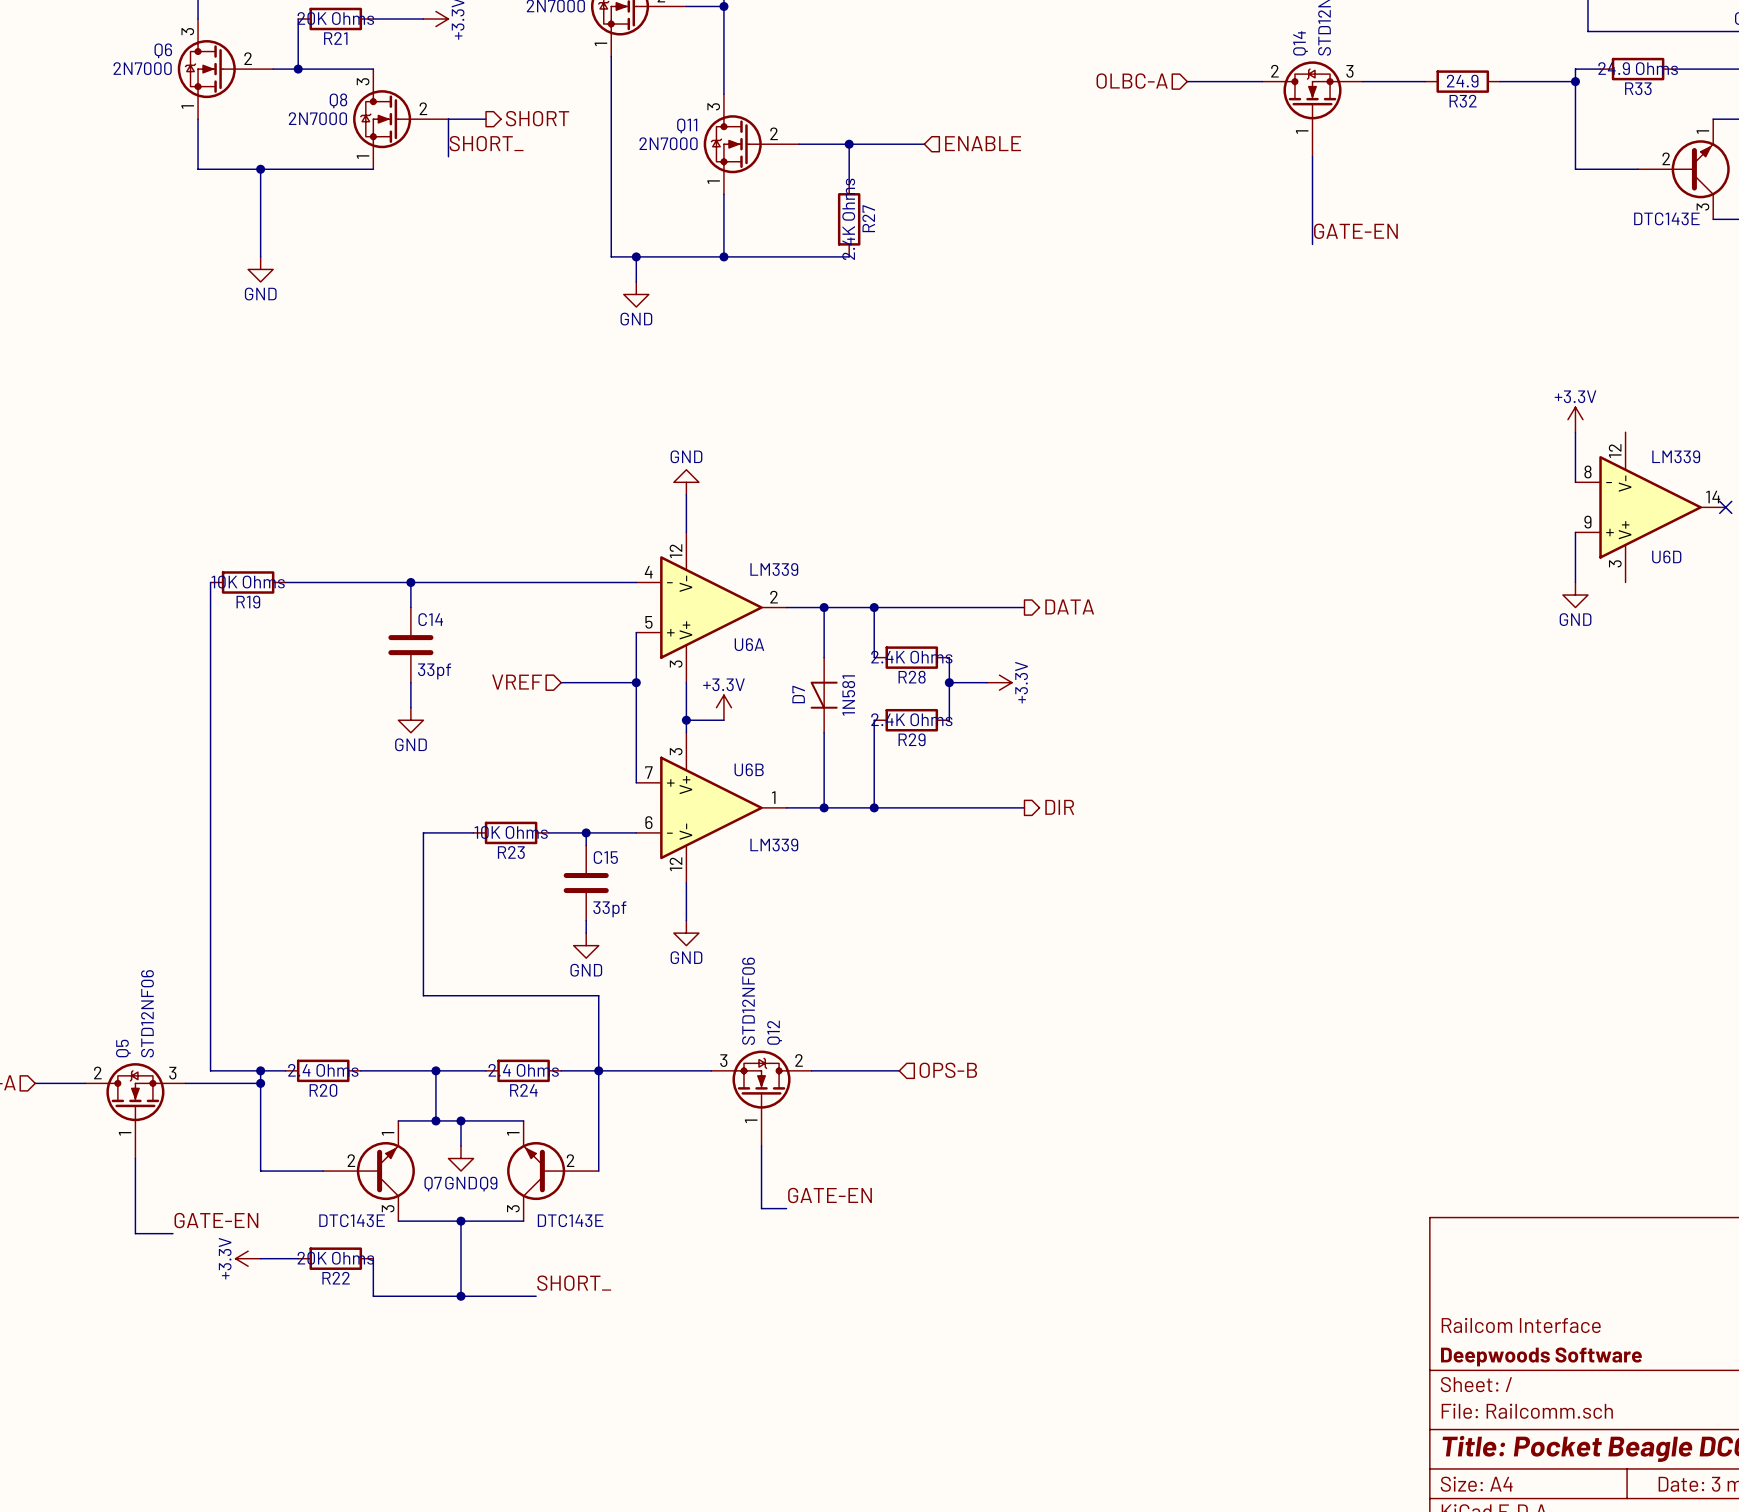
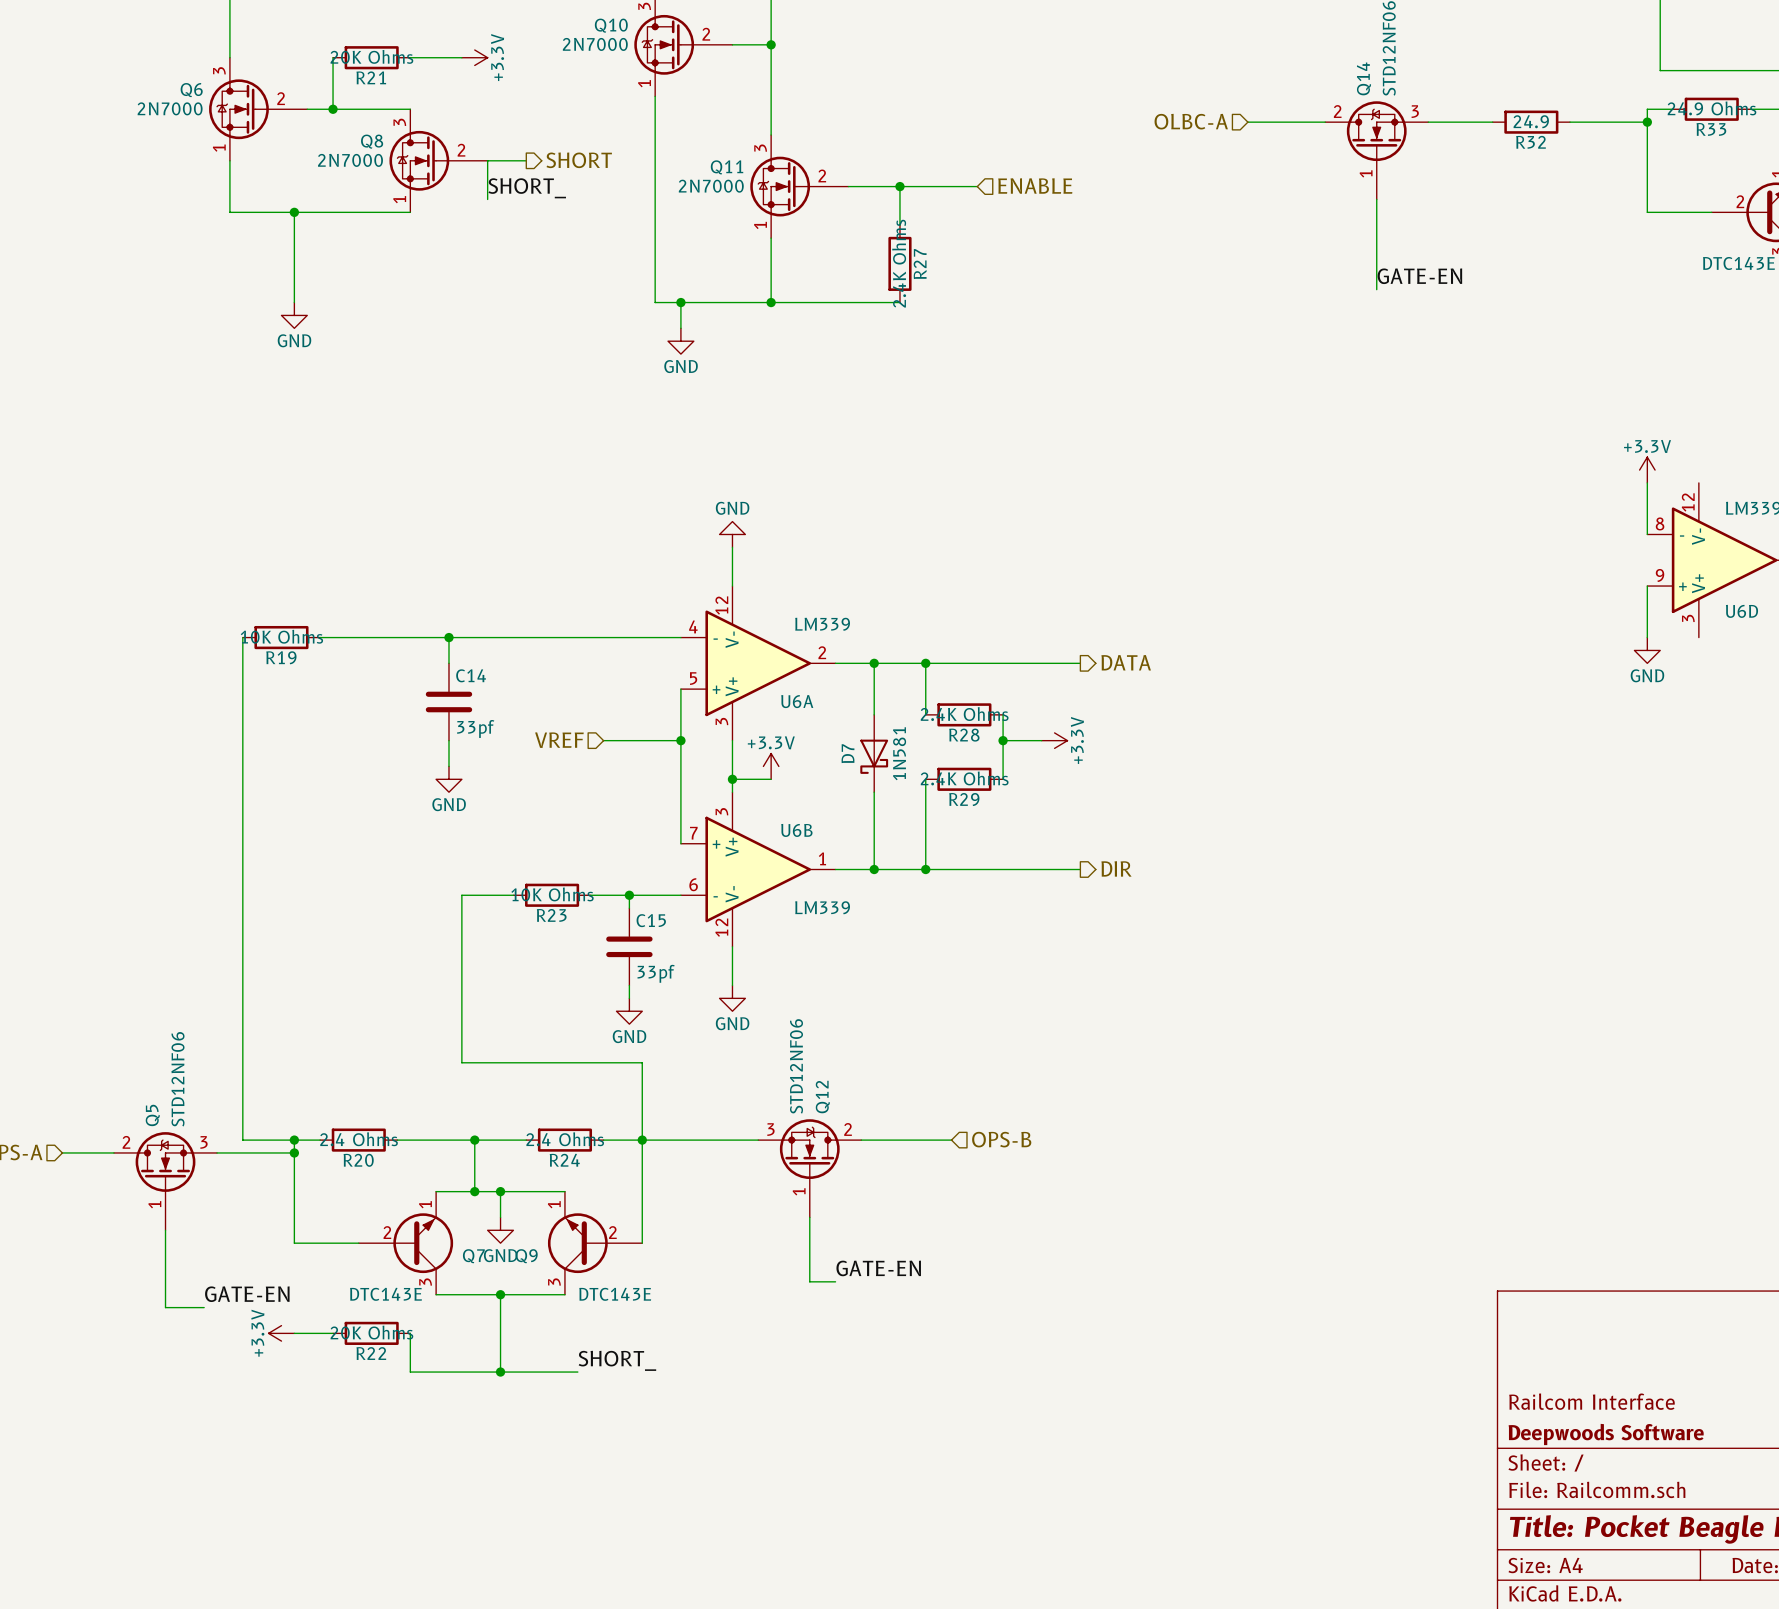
D7 symbol: [810, 657, 838, 733] -> [860, 714, 889, 793]

